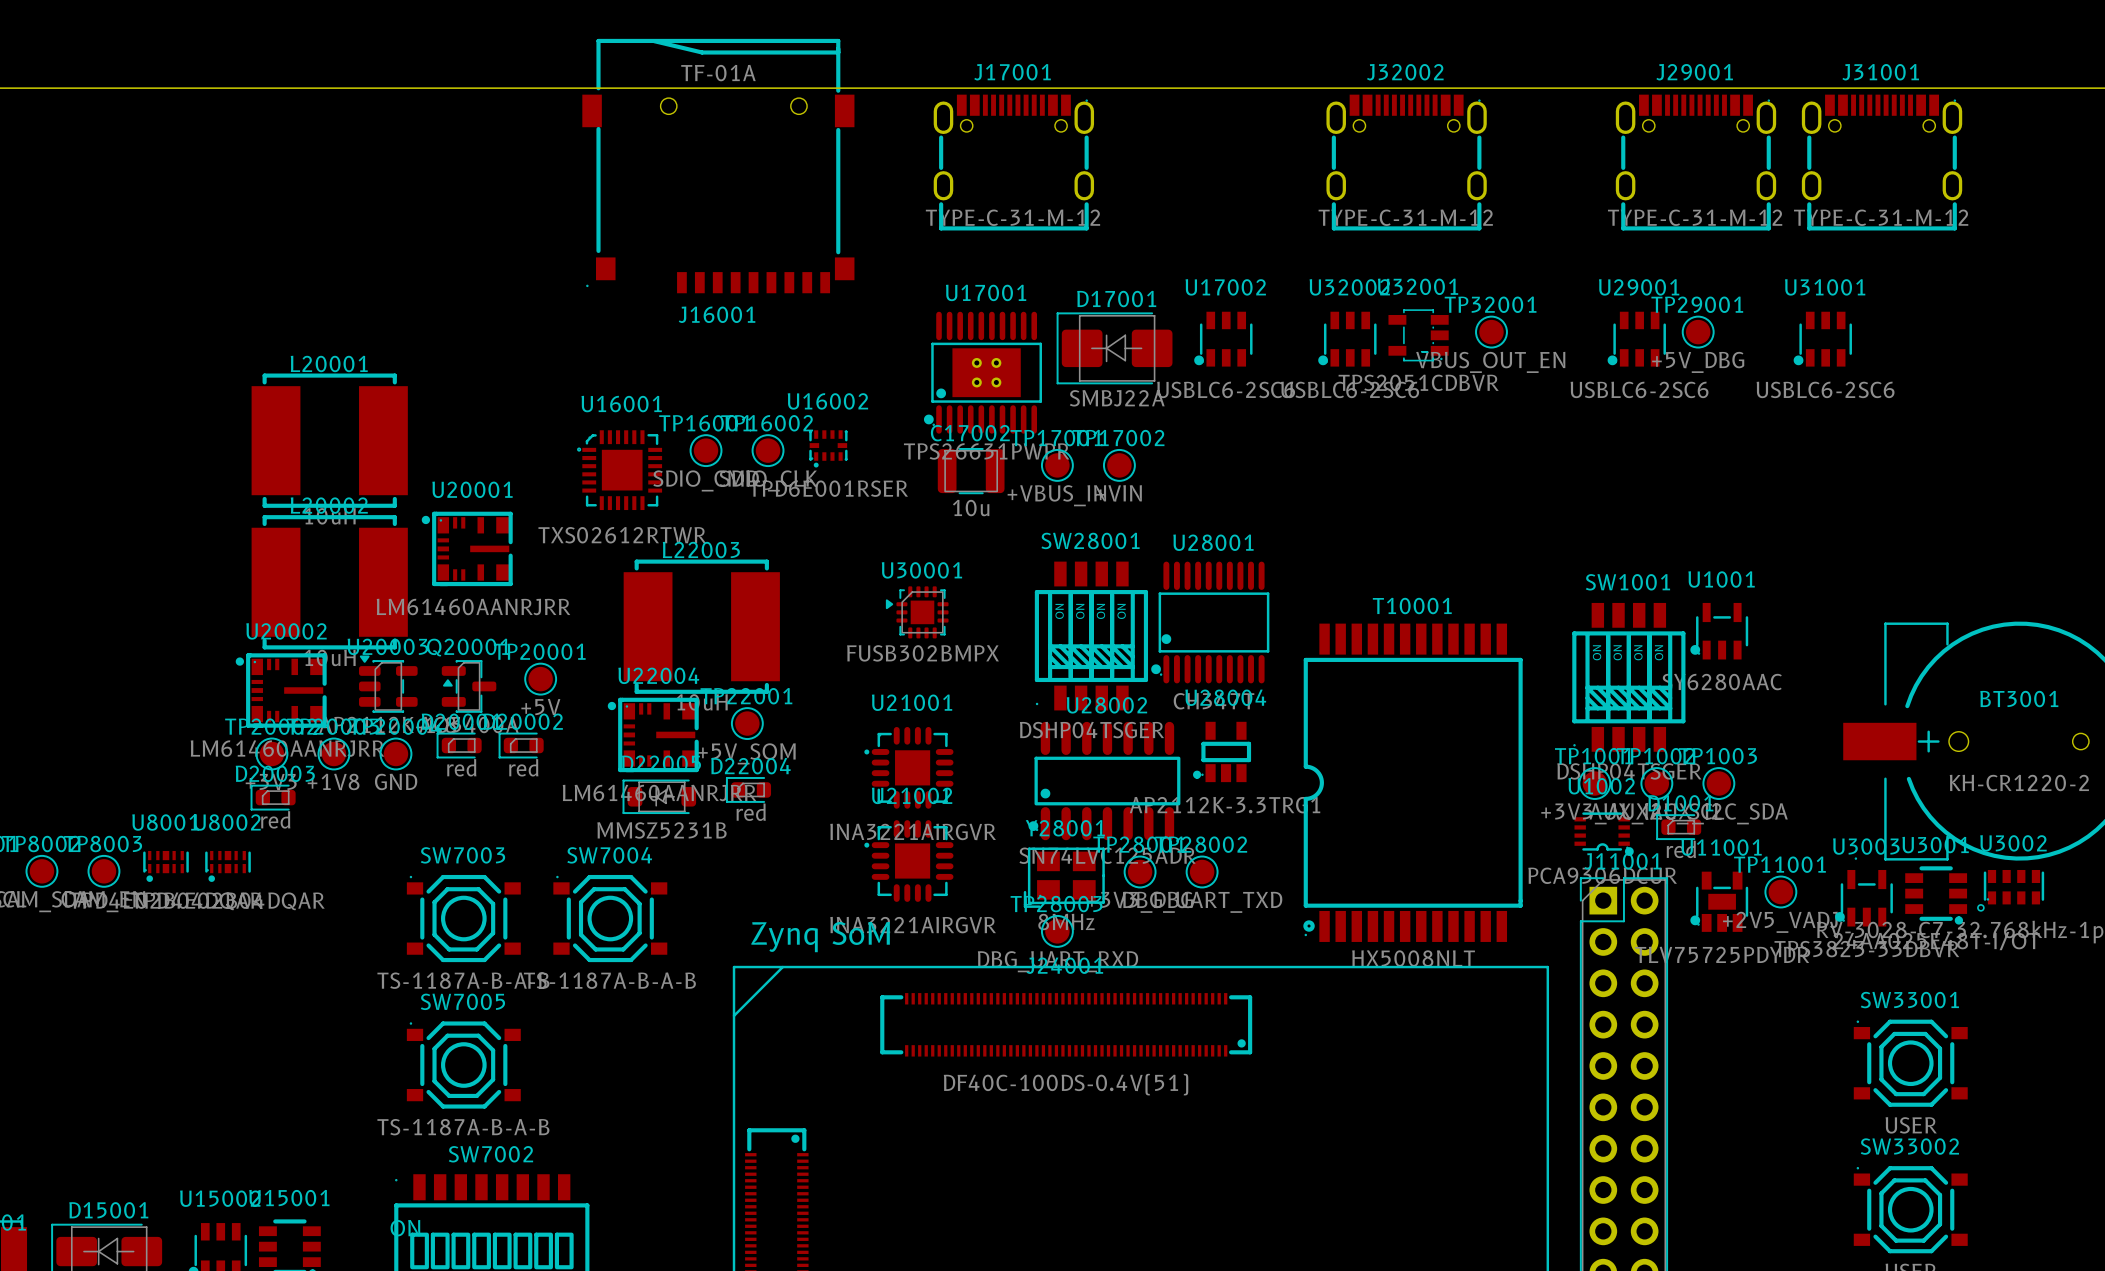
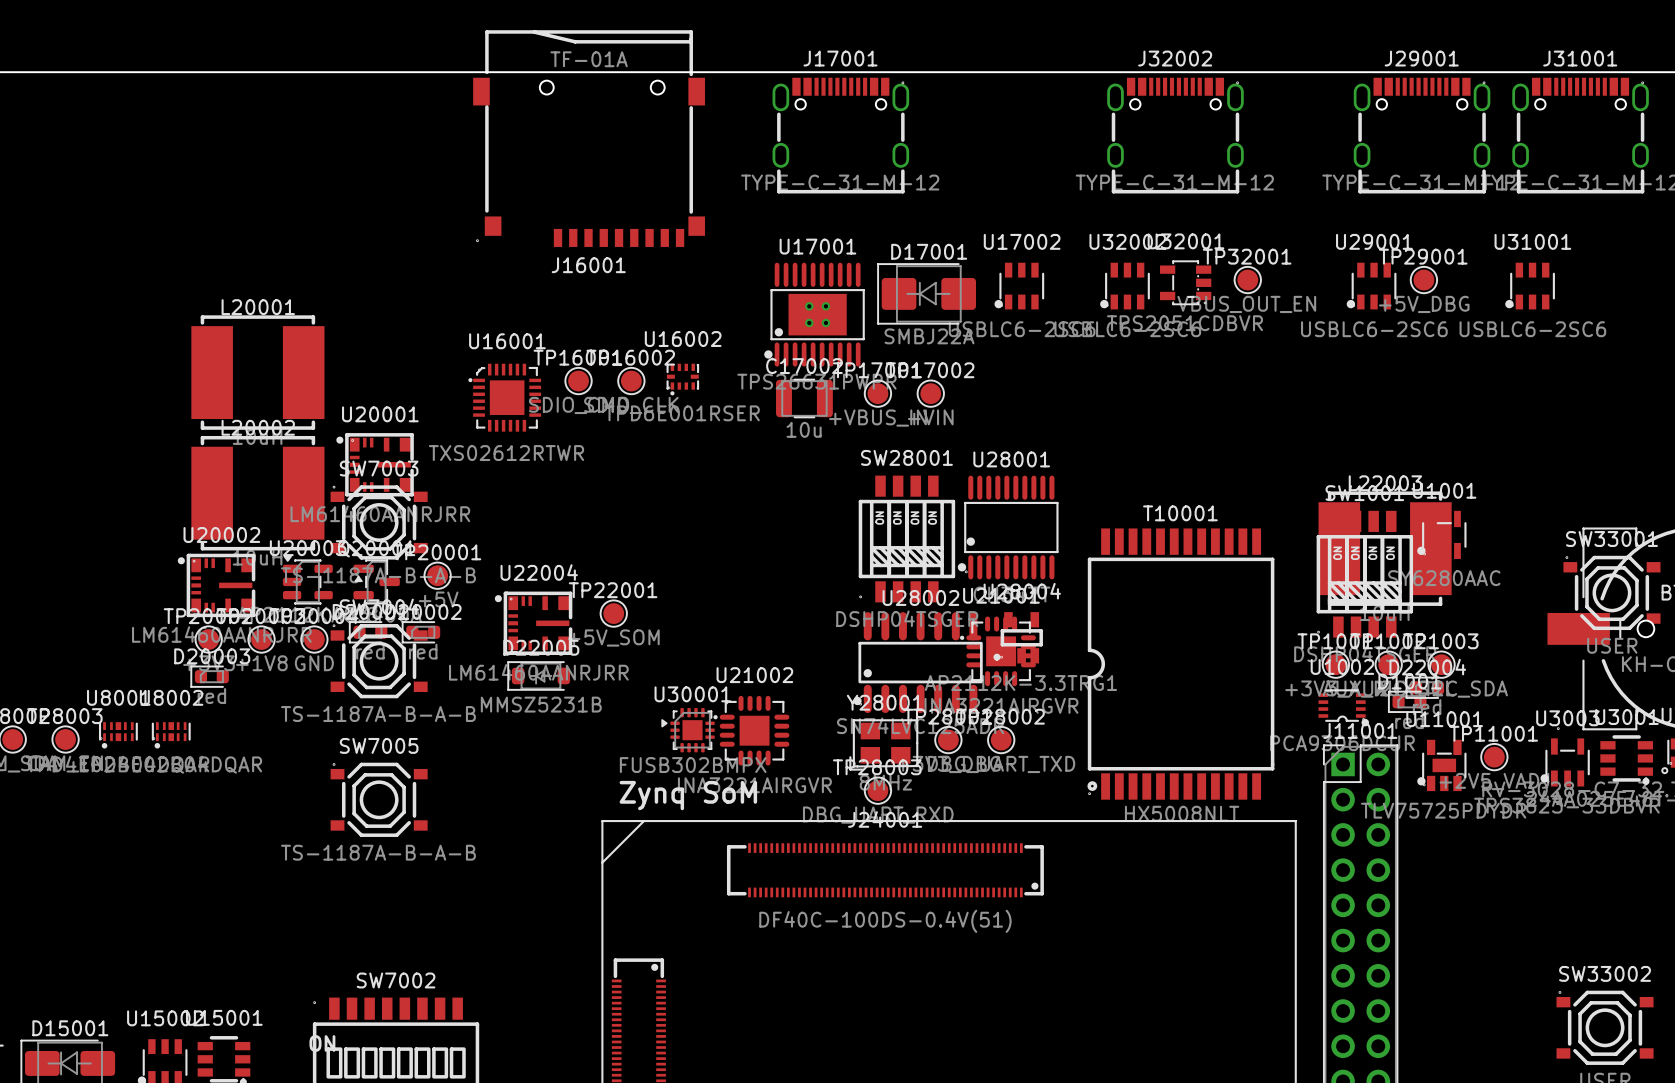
U30001 position: (917, 612) -> (688, 730)
L22003 position: (701, 626) -> (1385, 548)
U21001 position: (908, 767) -> (997, 651)
D22004 position: (748, 789) -> (1424, 687)
SW7003 position: (463, 918) -> (379, 522)
SW7004 position: (610, 918) -> (379, 661)
SW33001 position: (1910, 1063) -> (1611, 592)
SW7005 position: (463, 1065) -> (379, 799)

